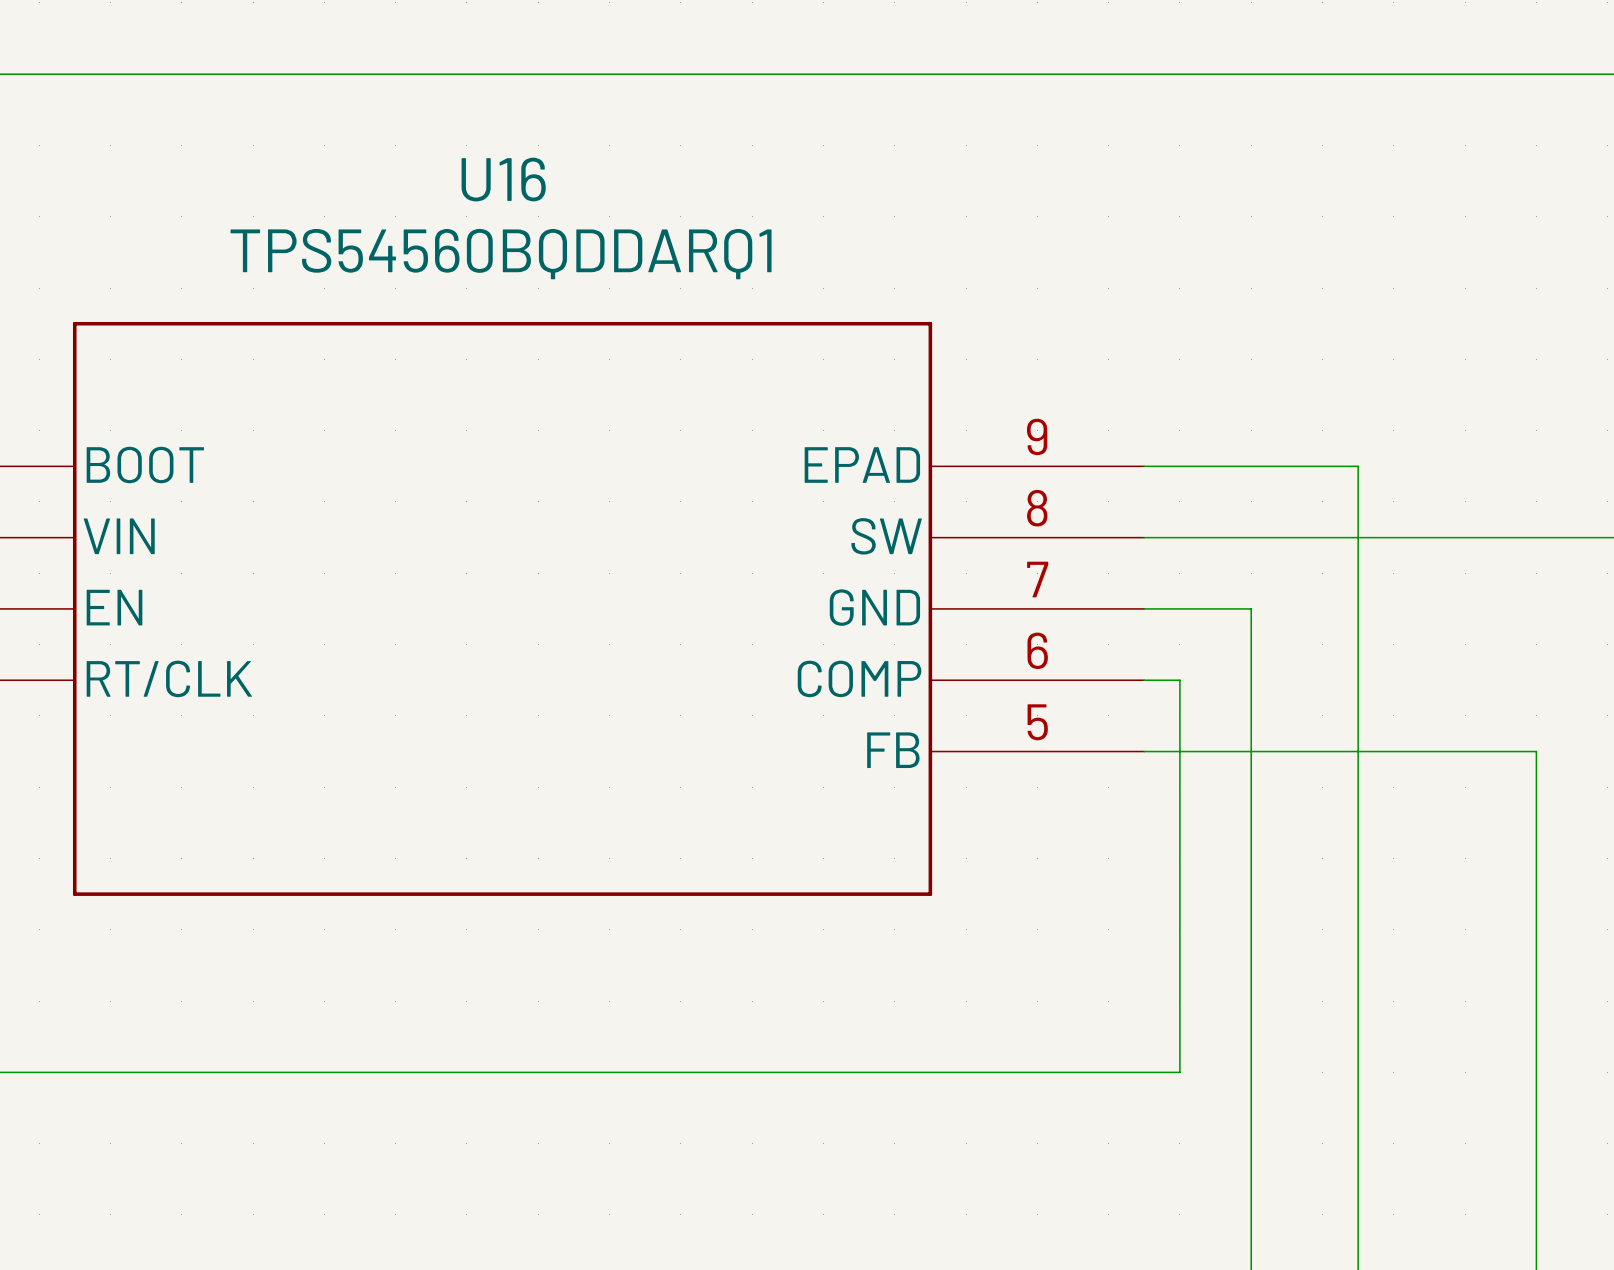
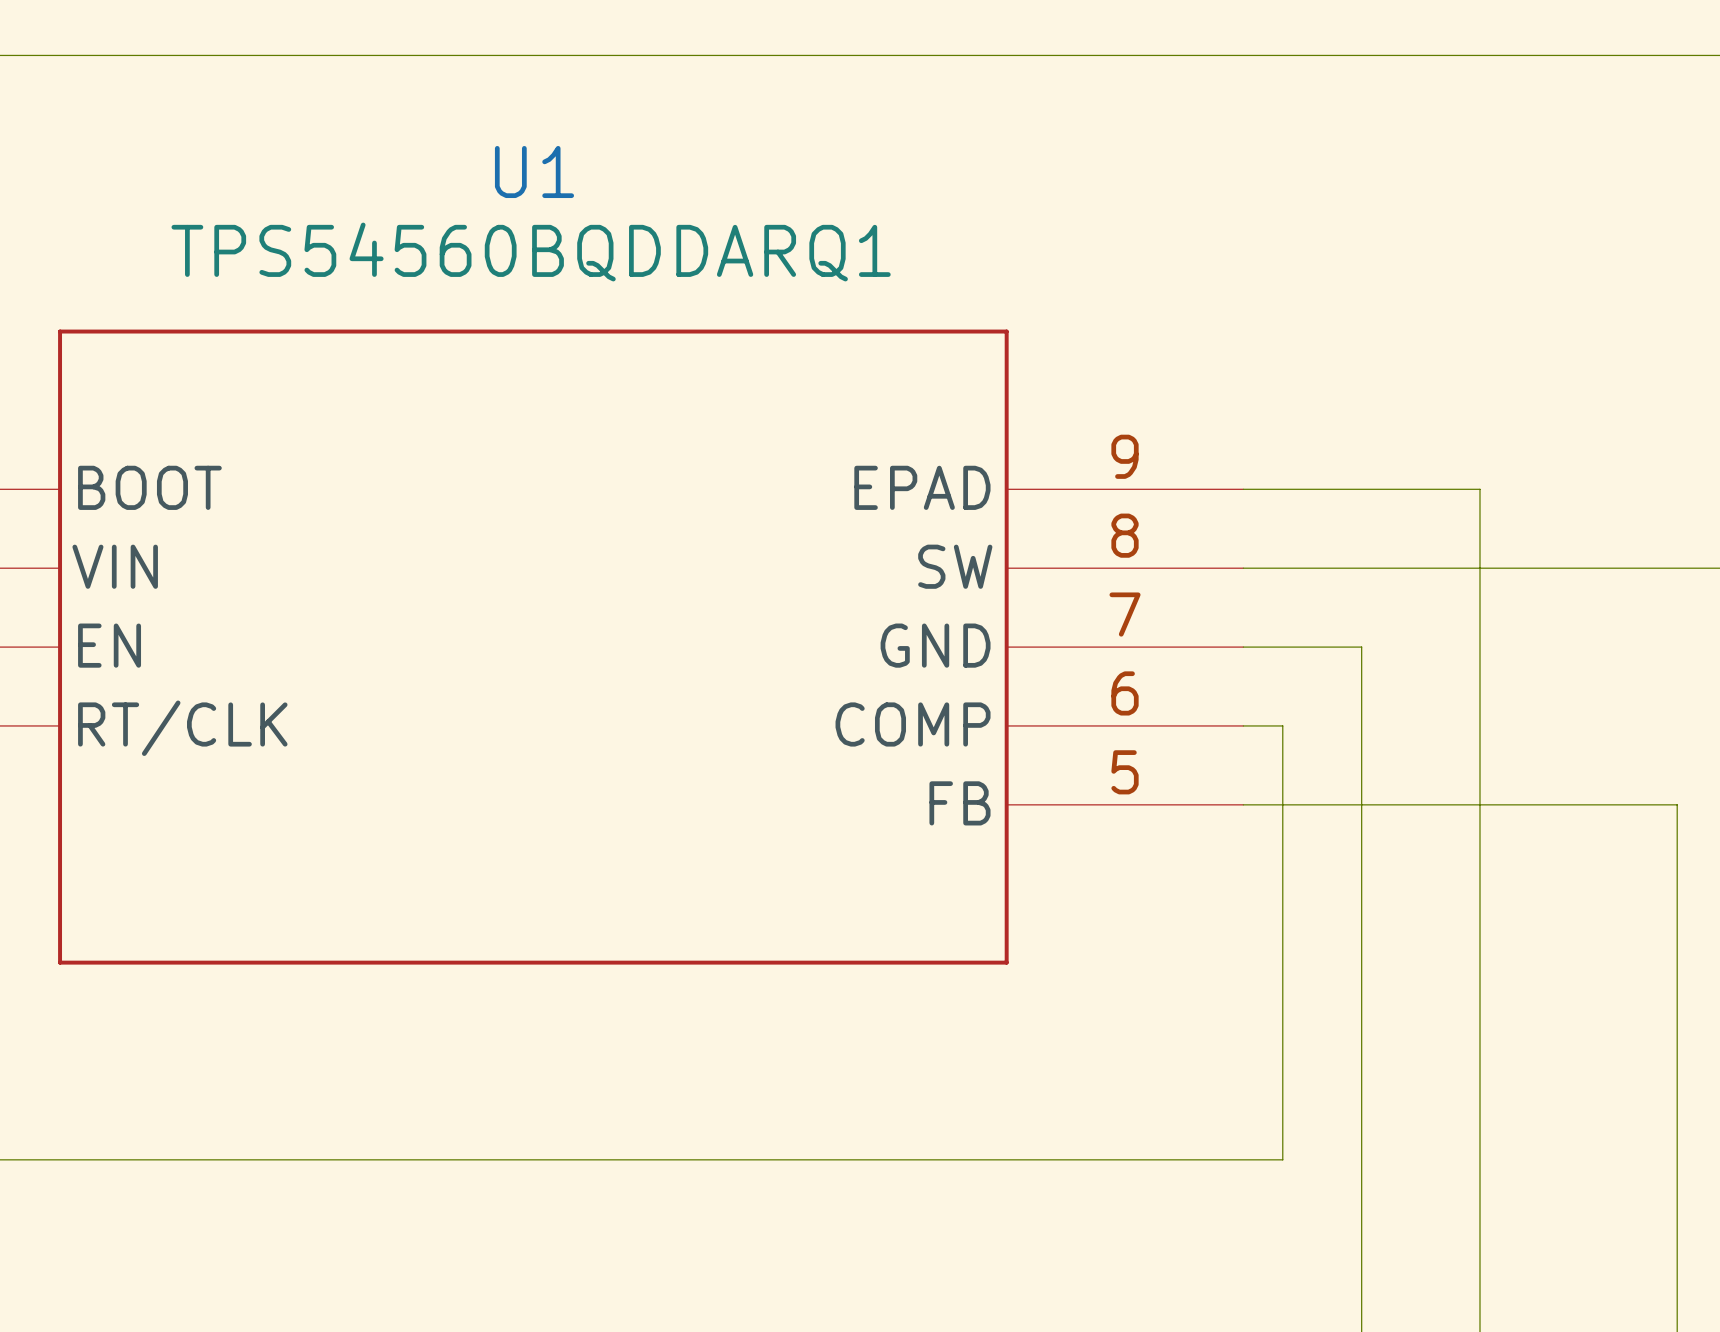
U16 name: U16 (503, 179) -> U1 (534, 172)

